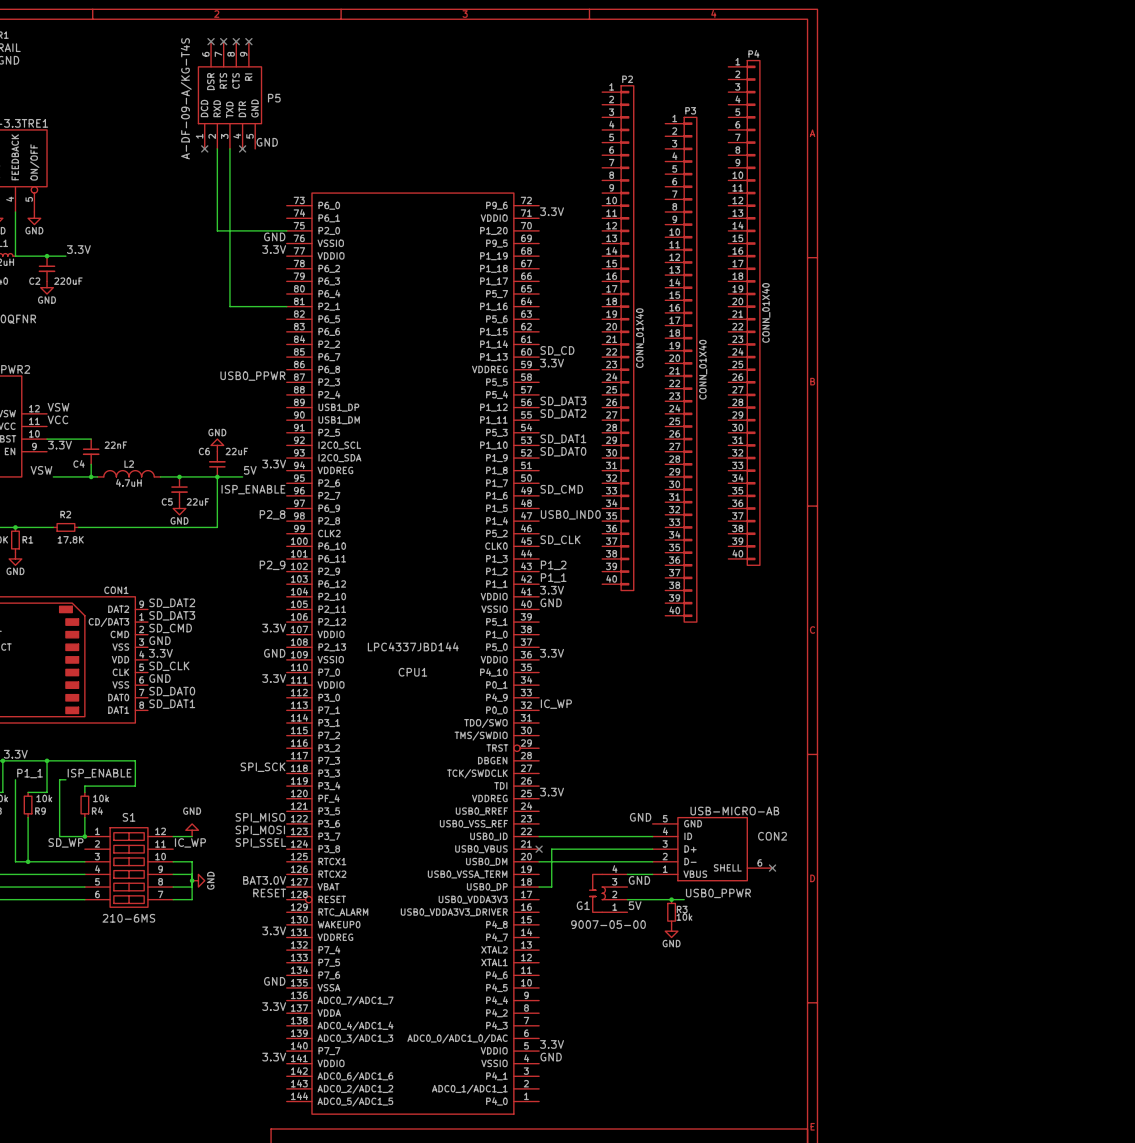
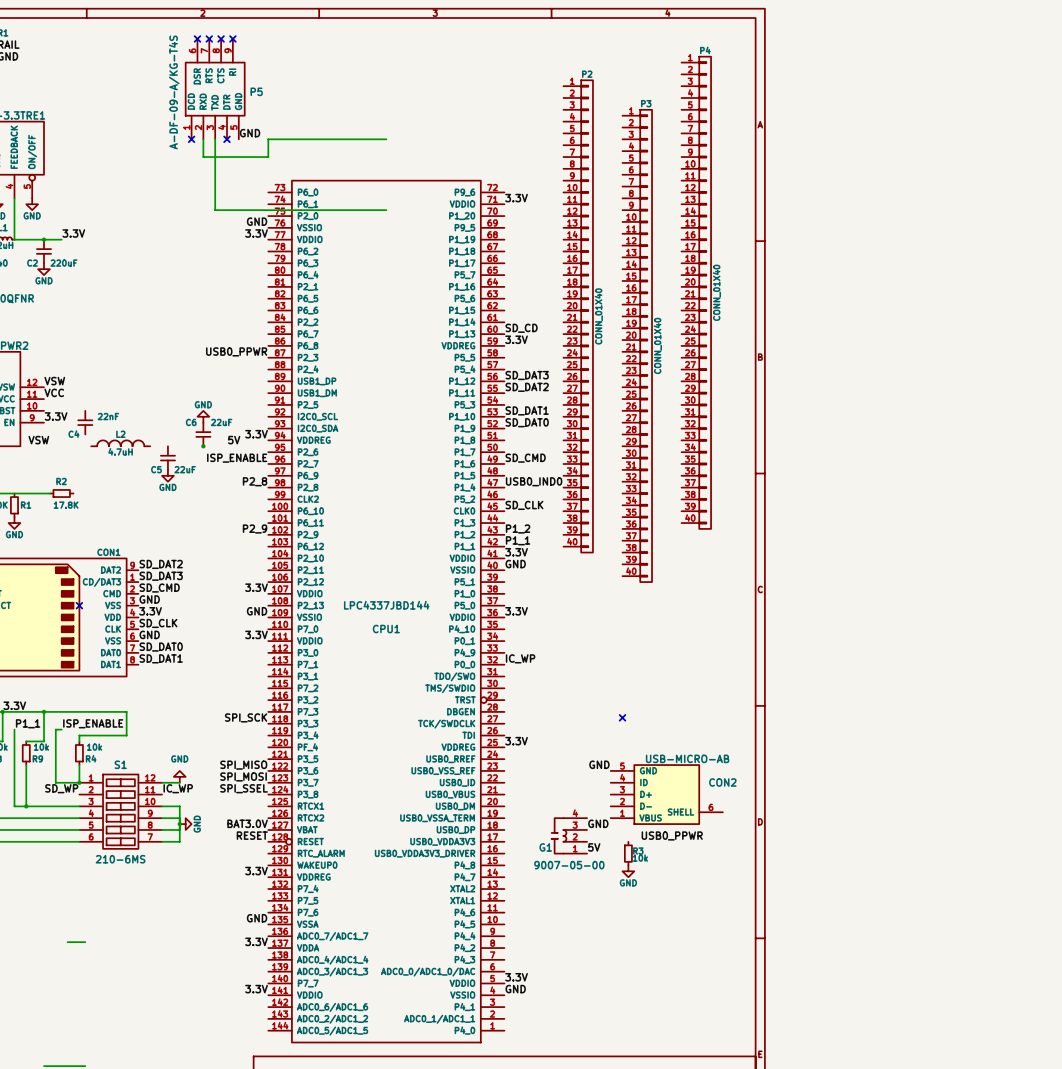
wire: (217, 167) (217, 230) (286, 230) -> (203, 157) (268, 157) (268, 139) (386, 139)
wire: (229, 224) (229, 306) (286, 306) -> (215, 210) (386, 210)
wire: (47, 439) (91, 439) -> none
wire: (91, 464) (91, 476) -> none
wire: (53, 476) (97, 476) -> none
junction: (91, 476) -> none
wire: (160, 476) (242, 476) -> none
junction: (179, 476) -> none
wire: (217, 476) (217, 527) (78, 527) -> none
junction: (15, 527) -> none
no-connect mark: none -> (79, 605)
no-connect mark: none -> (622, 717)
wire: (539, 836) (652, 836) -> none
no-connect mark: (539, 849) -> none
wire: (652, 849) (551, 849) (551, 887) (539, 887) -> none
wire: (539, 861) (652, 861) -> none
no-connect mark: (772, 868) -> none
wire: (627, 874) (652, 874) -> none
wire: (627, 899) (684, 899) -> none
junction: (671, 899) -> none
wire: none -> (67, 942) (85, 942)
wire: none -> (43, 1066) (85, 1066)

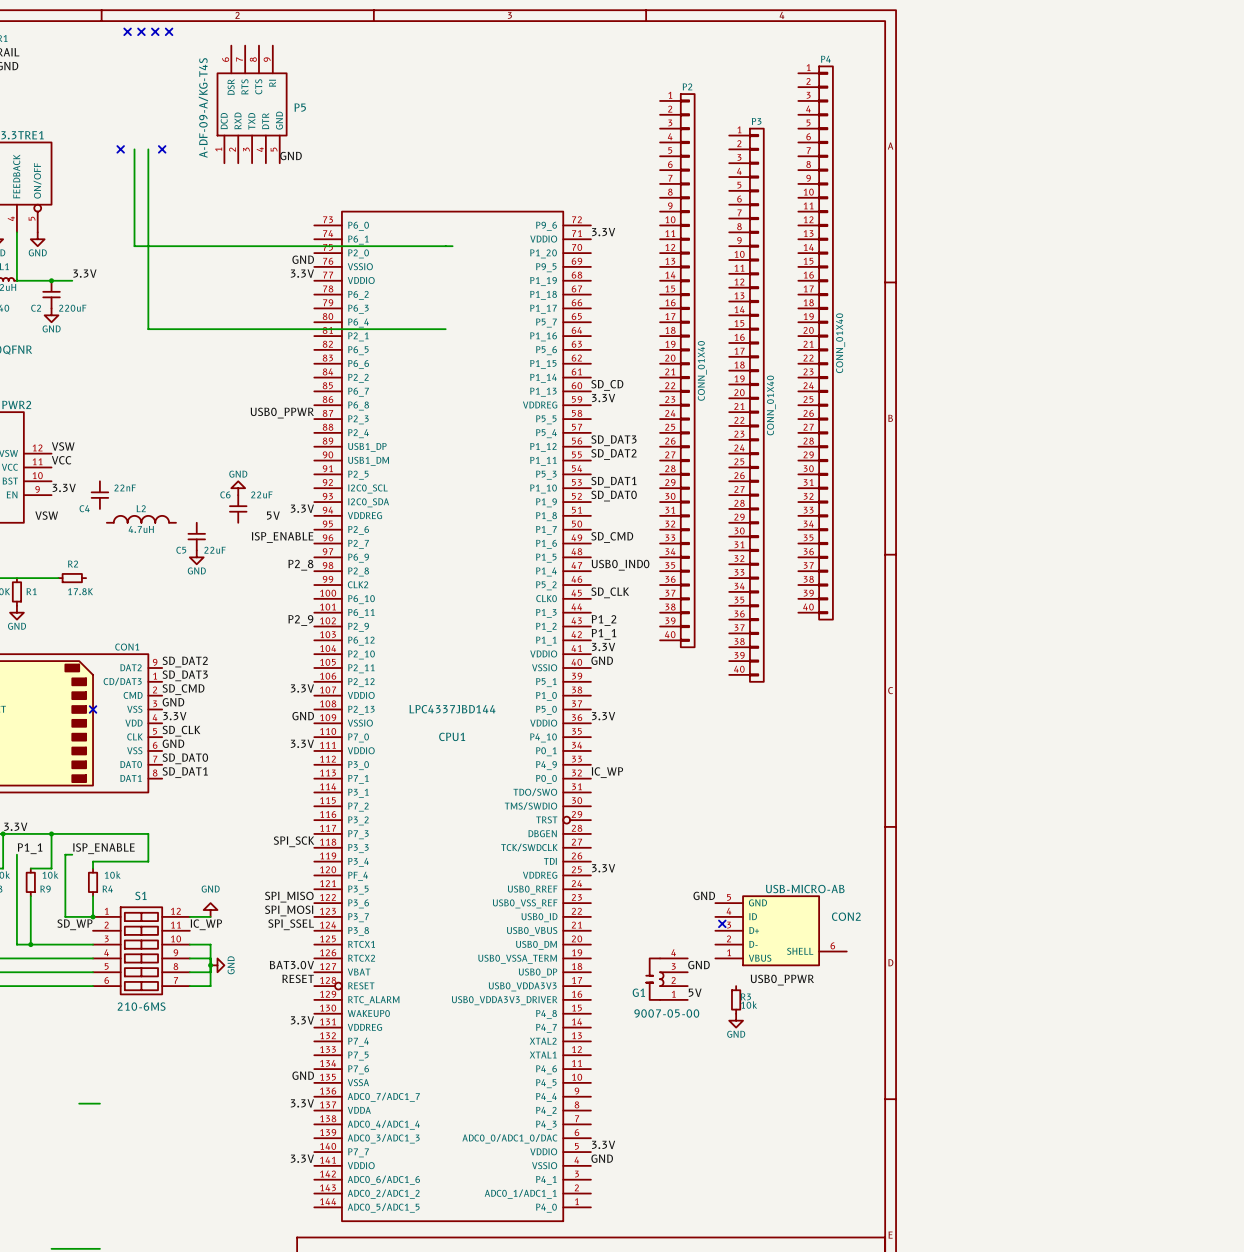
no-connect mark: none -> (127, 31)
no-connect mark: none -> (141, 31)
no-connect mark: none -> (155, 31)
no-connect mark: none -> (169, 31)
no-connect mark: (197, 38) -> none
no-connect mark: (209, 38) -> none
no-connect mark: (221, 38) -> none
no-connect mark: (232, 38) -> none
no-connect mark: none -> (120, 149)
wire: none -> (148, 149) (148, 329) (445, 329)
no-connect mark: none -> (162, 149)
no-connect mark: (191, 139) -> none
wire: (203, 139) (203, 157) (268, 157) (268, 139) (386, 139) -> none
wire: (215, 139) (215, 210) -> (134, 149) (134, 246) (252, 246)
no-connect mark: (226, 139) -> none
junction: (203, 446) -> none
no-connect mark: (622, 717) -> none
no-connect mark: none -> (722, 923)

